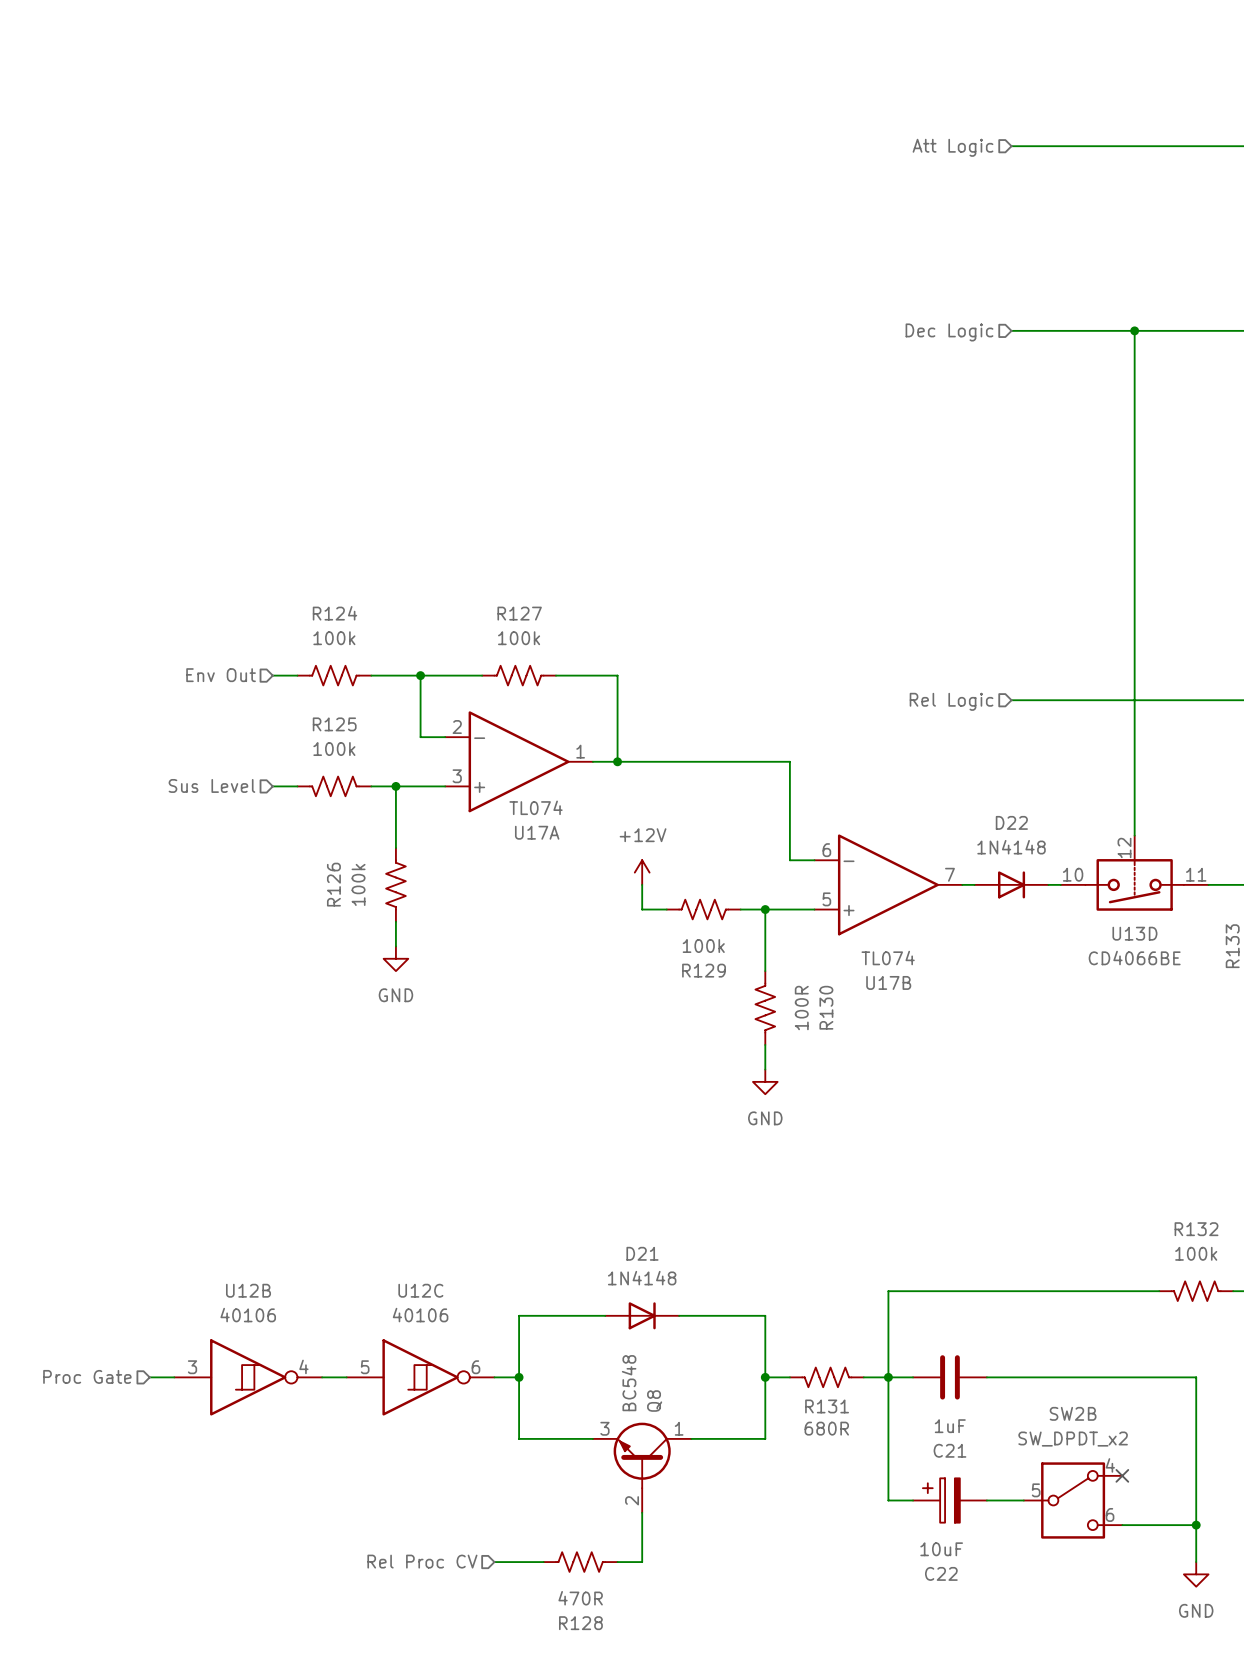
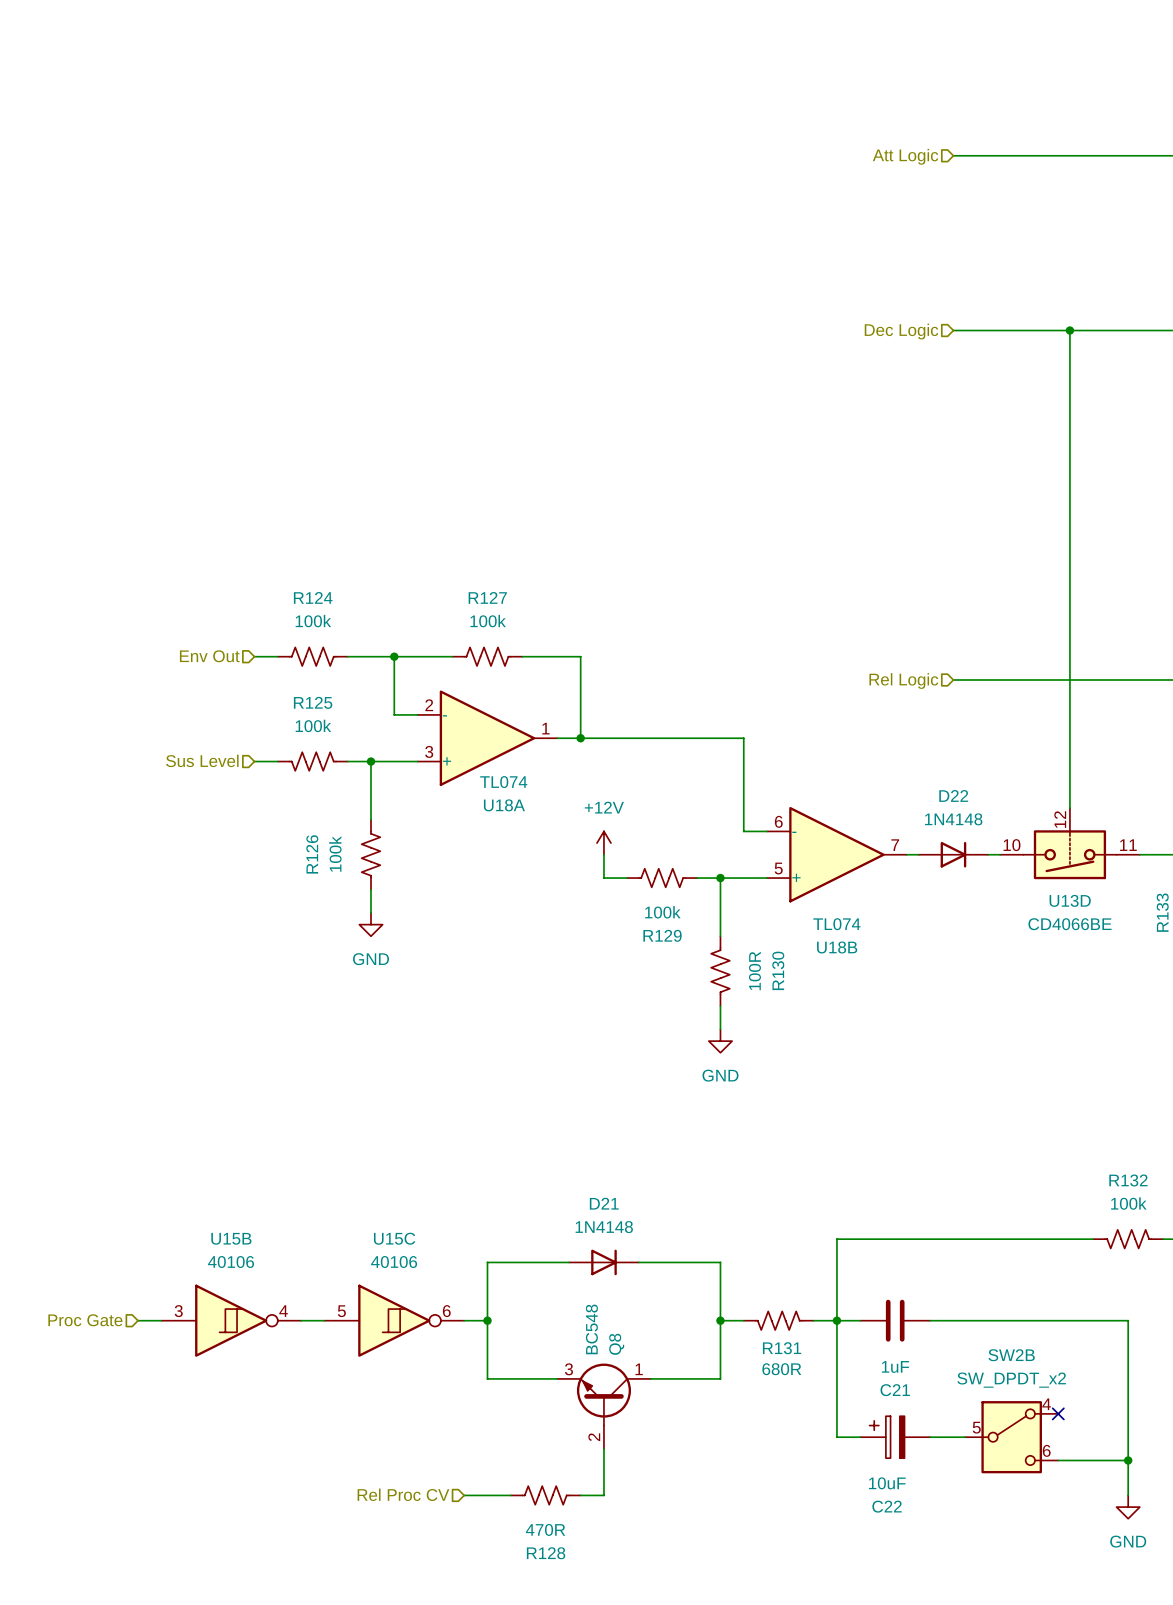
U17A name: U17A (537, 832) -> U18A (504, 805)
U17B name: U17B (888, 982) -> U18B (837, 947)
U12B name: U12B (248, 1290) -> U15B (231, 1238)
U12C name: U12C (420, 1290) -> U15C (394, 1238)

